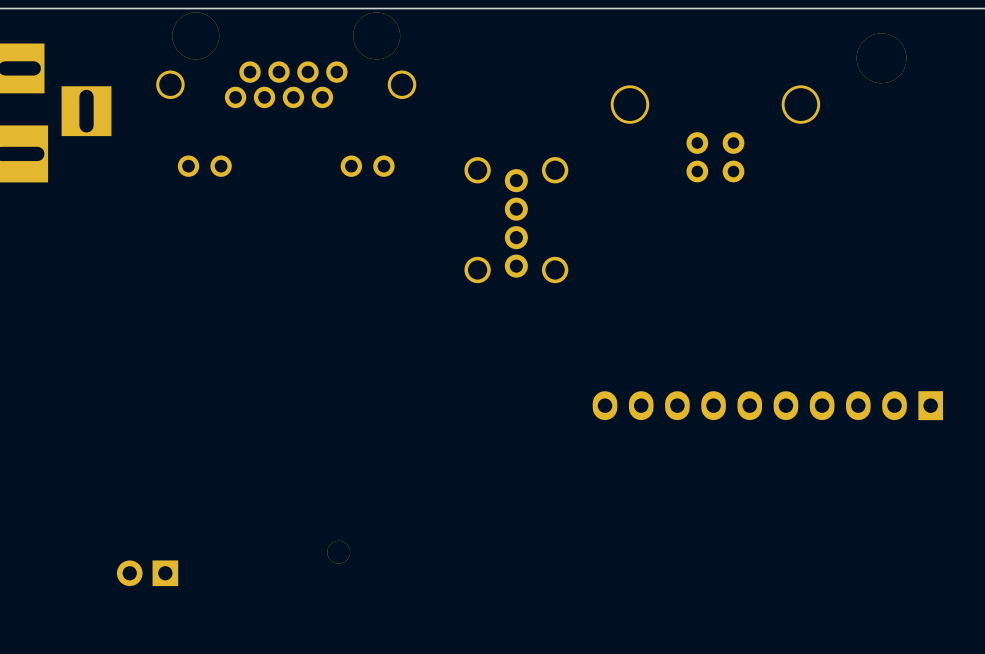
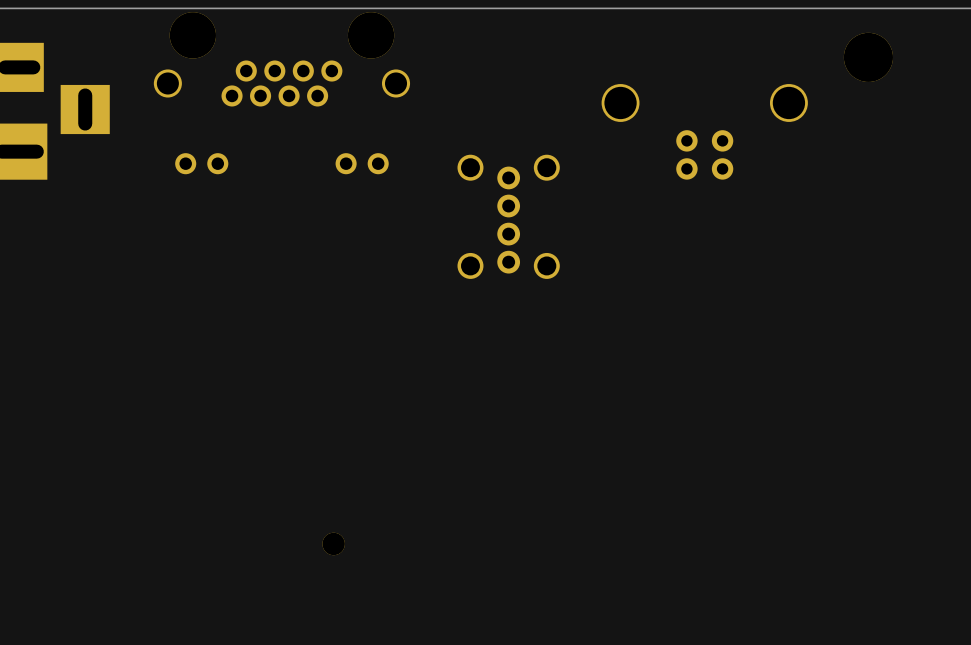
part: (767, 405) -> none
part: (147, 573) -> none

